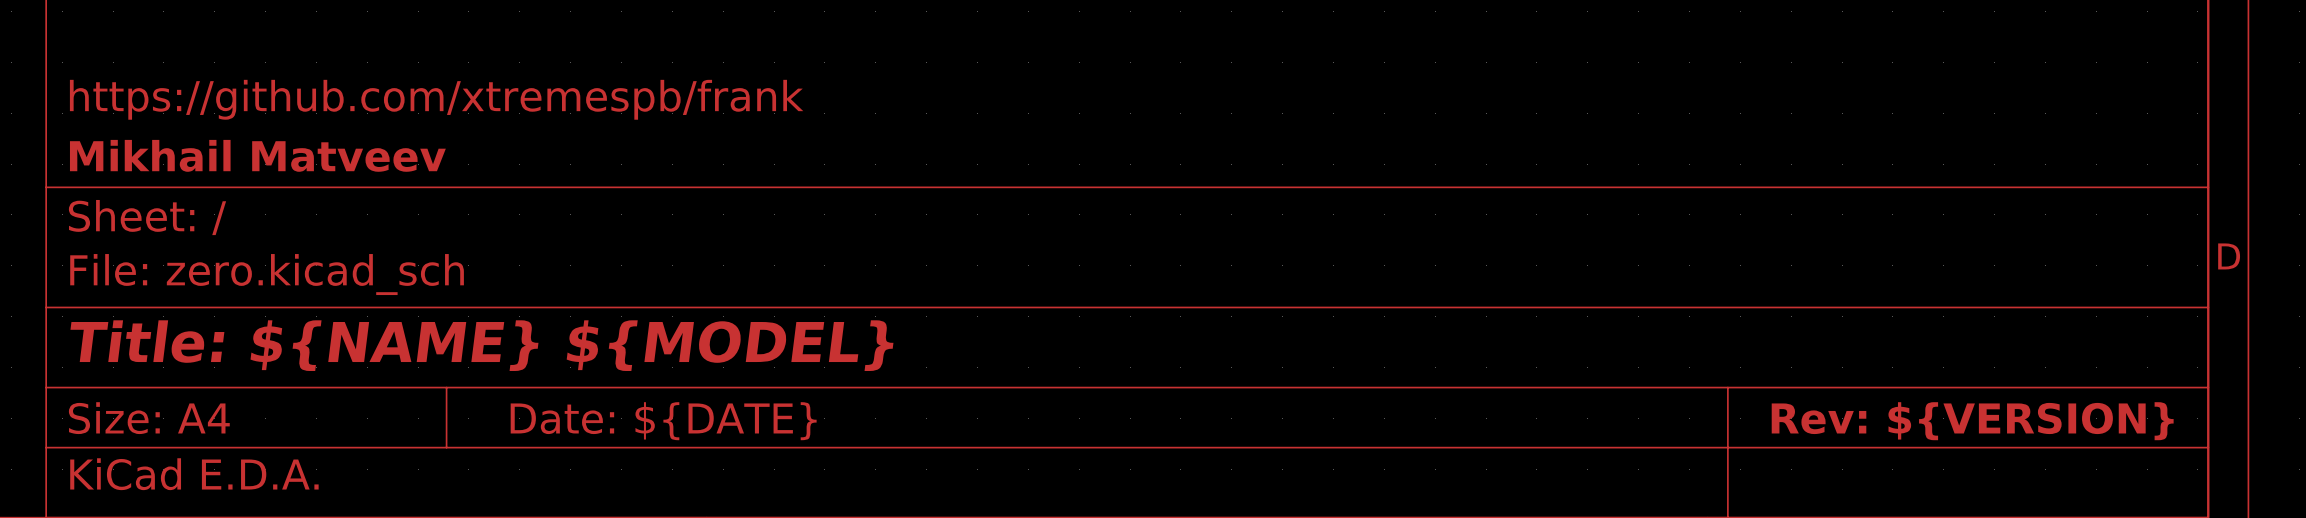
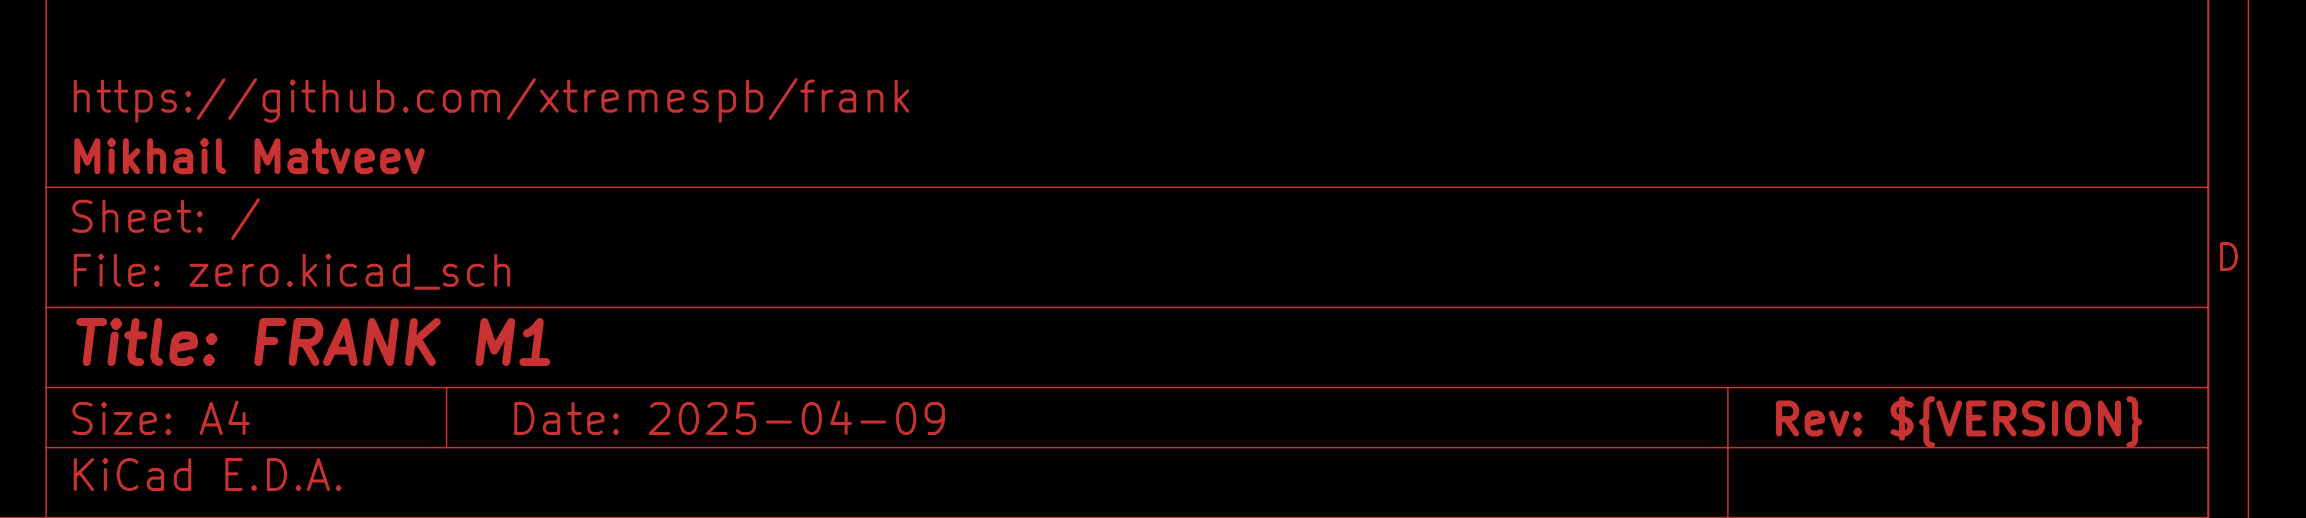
title block: Title: ${NAME} ${MODEL} (481, 345) -> Title: FRANK M1 (313, 342)
title block: Date: ${DATE} (663, 421) -> Date: 2025-04-09 (729, 417)

